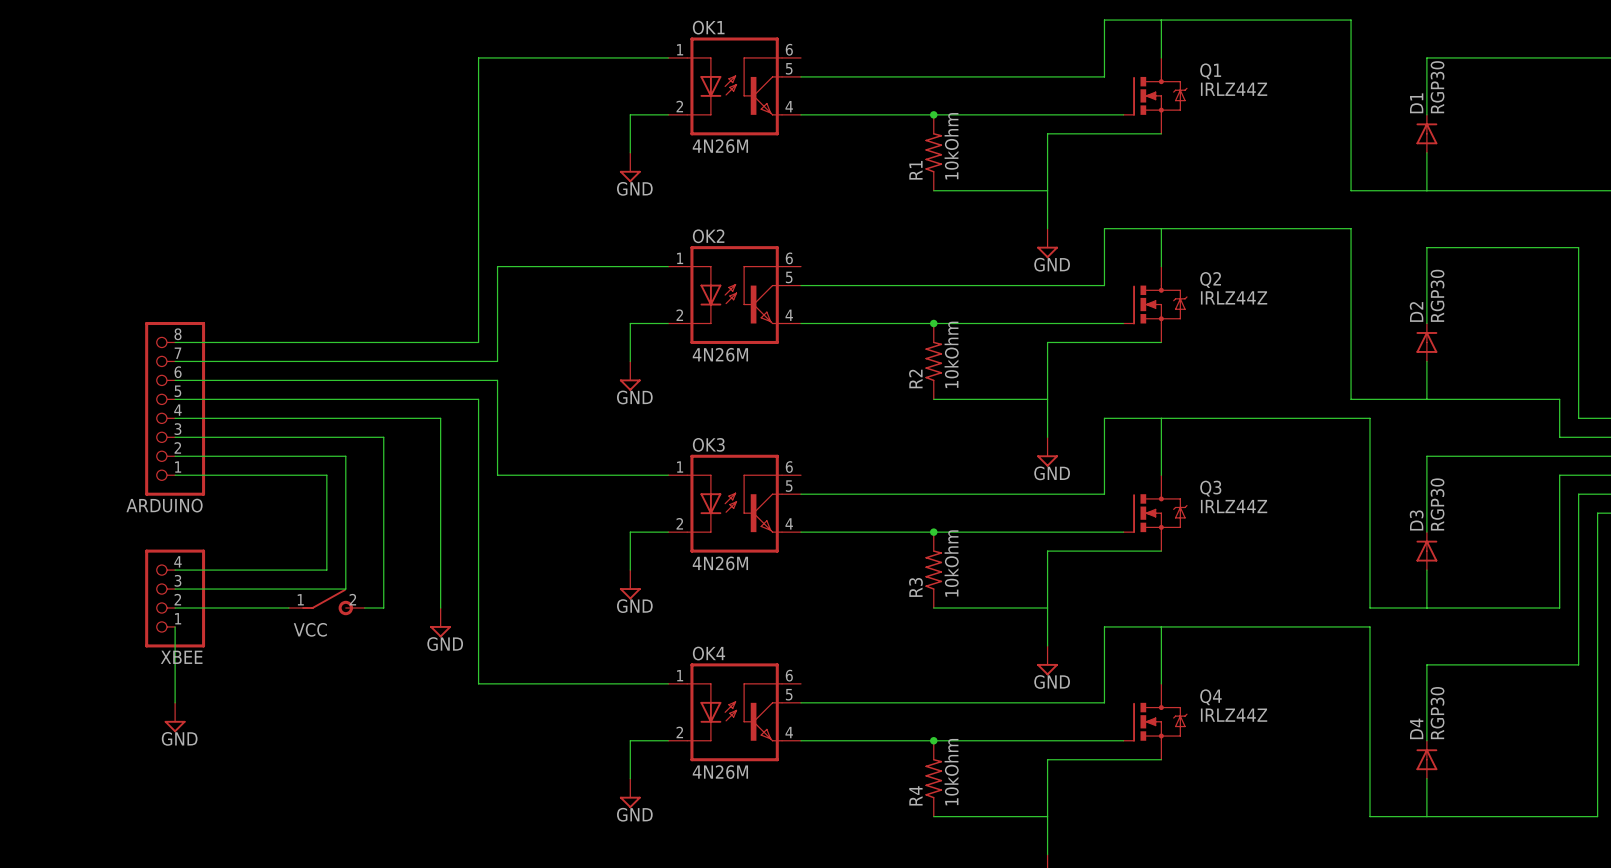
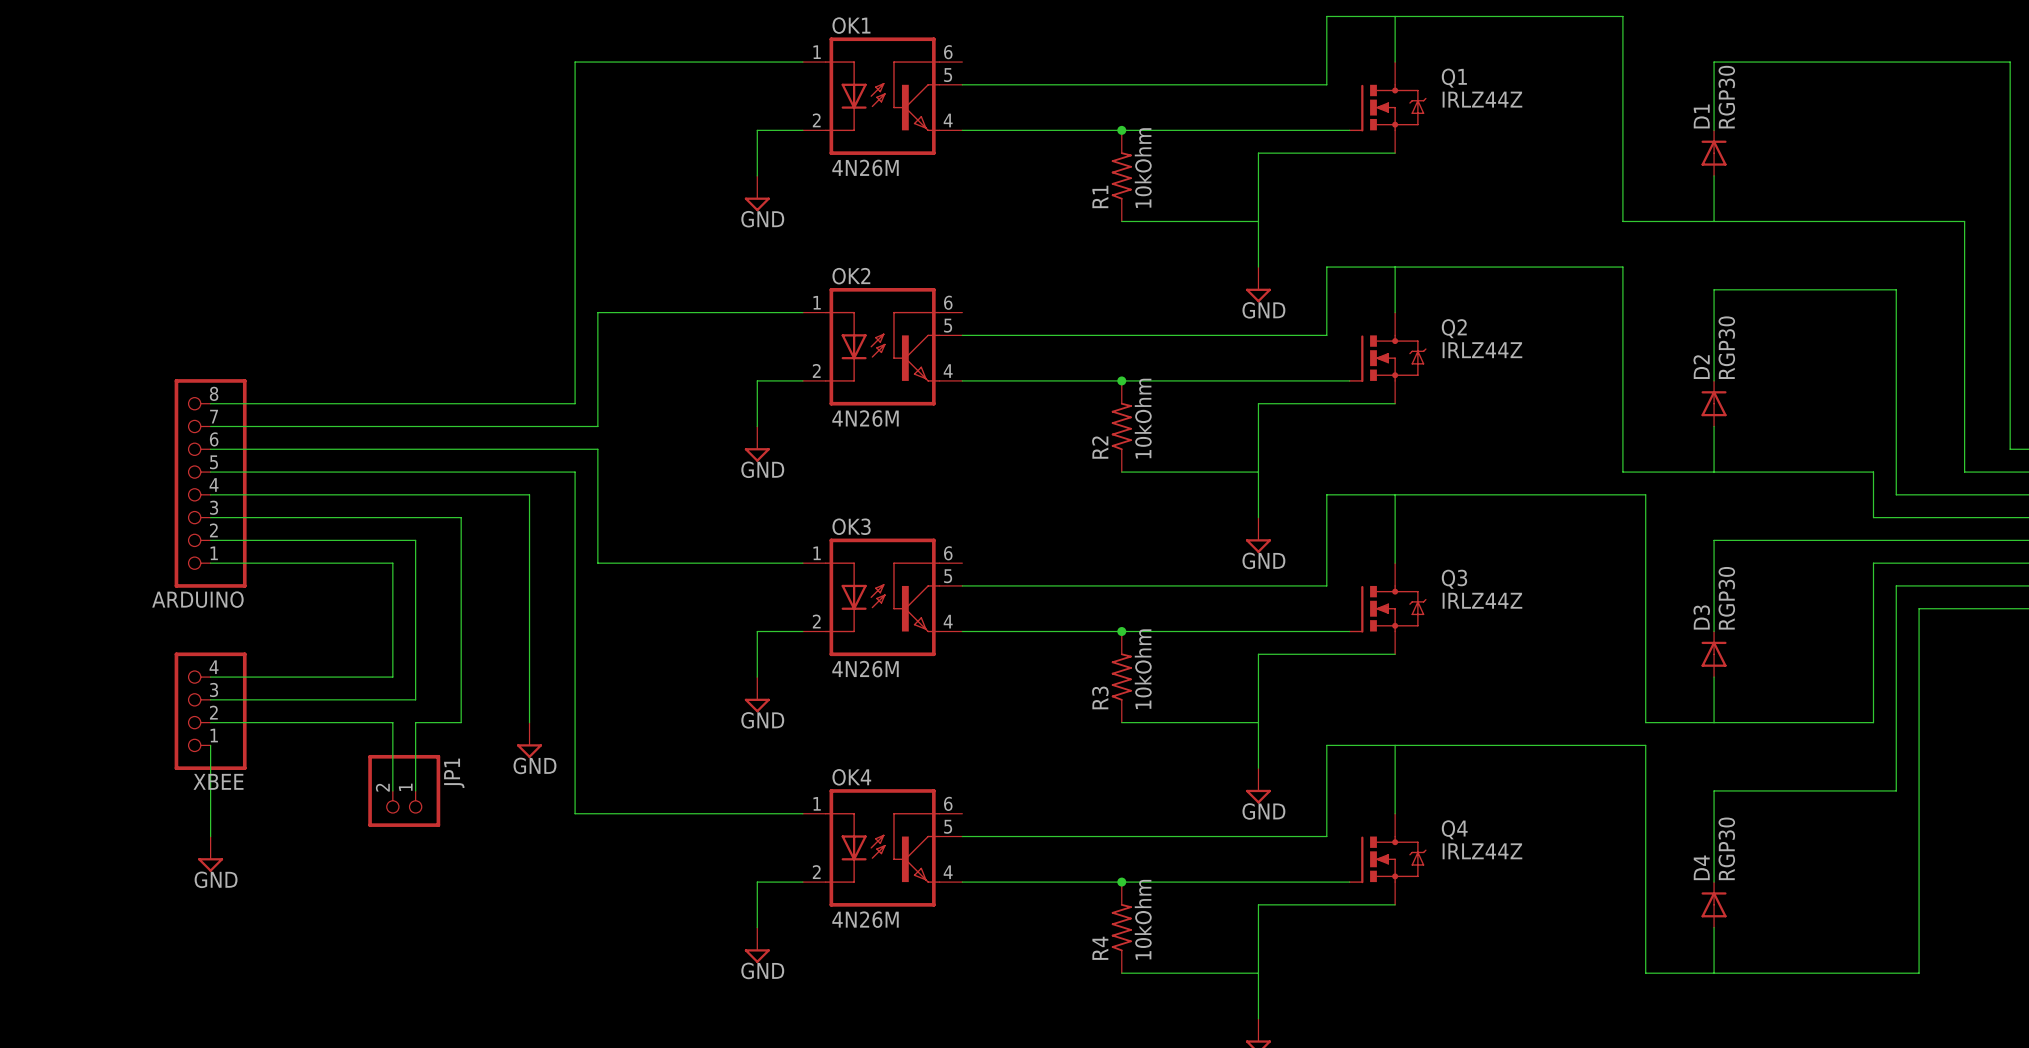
VCC: (326, 602) -> none
wire: none -> (347, 722) (392, 722) (392, 790)
wire: none -> (438, 722) (415, 722) (415, 790)
JP1: none -> (404, 790)

